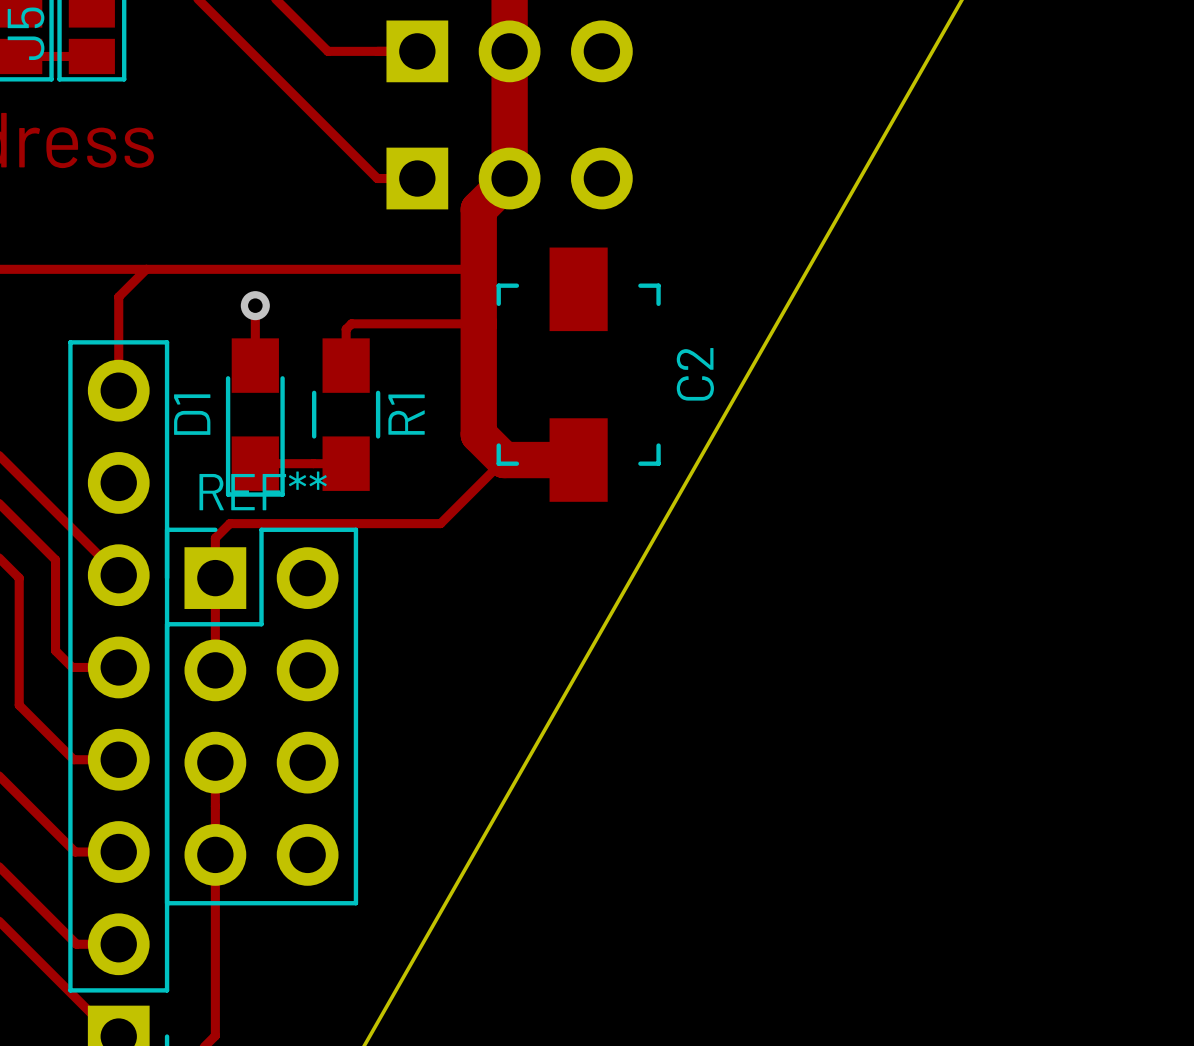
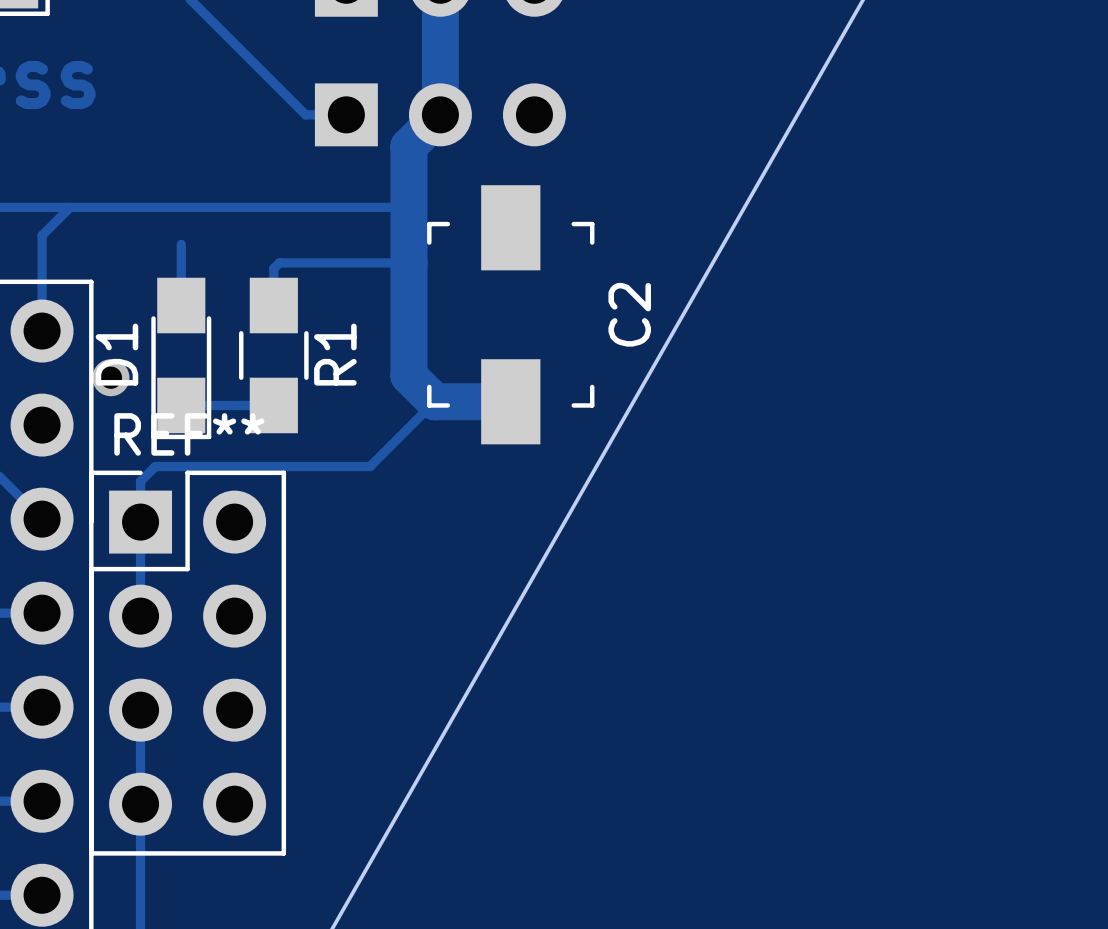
via: (255, 305) -> none
via: none -> (110, 377)

